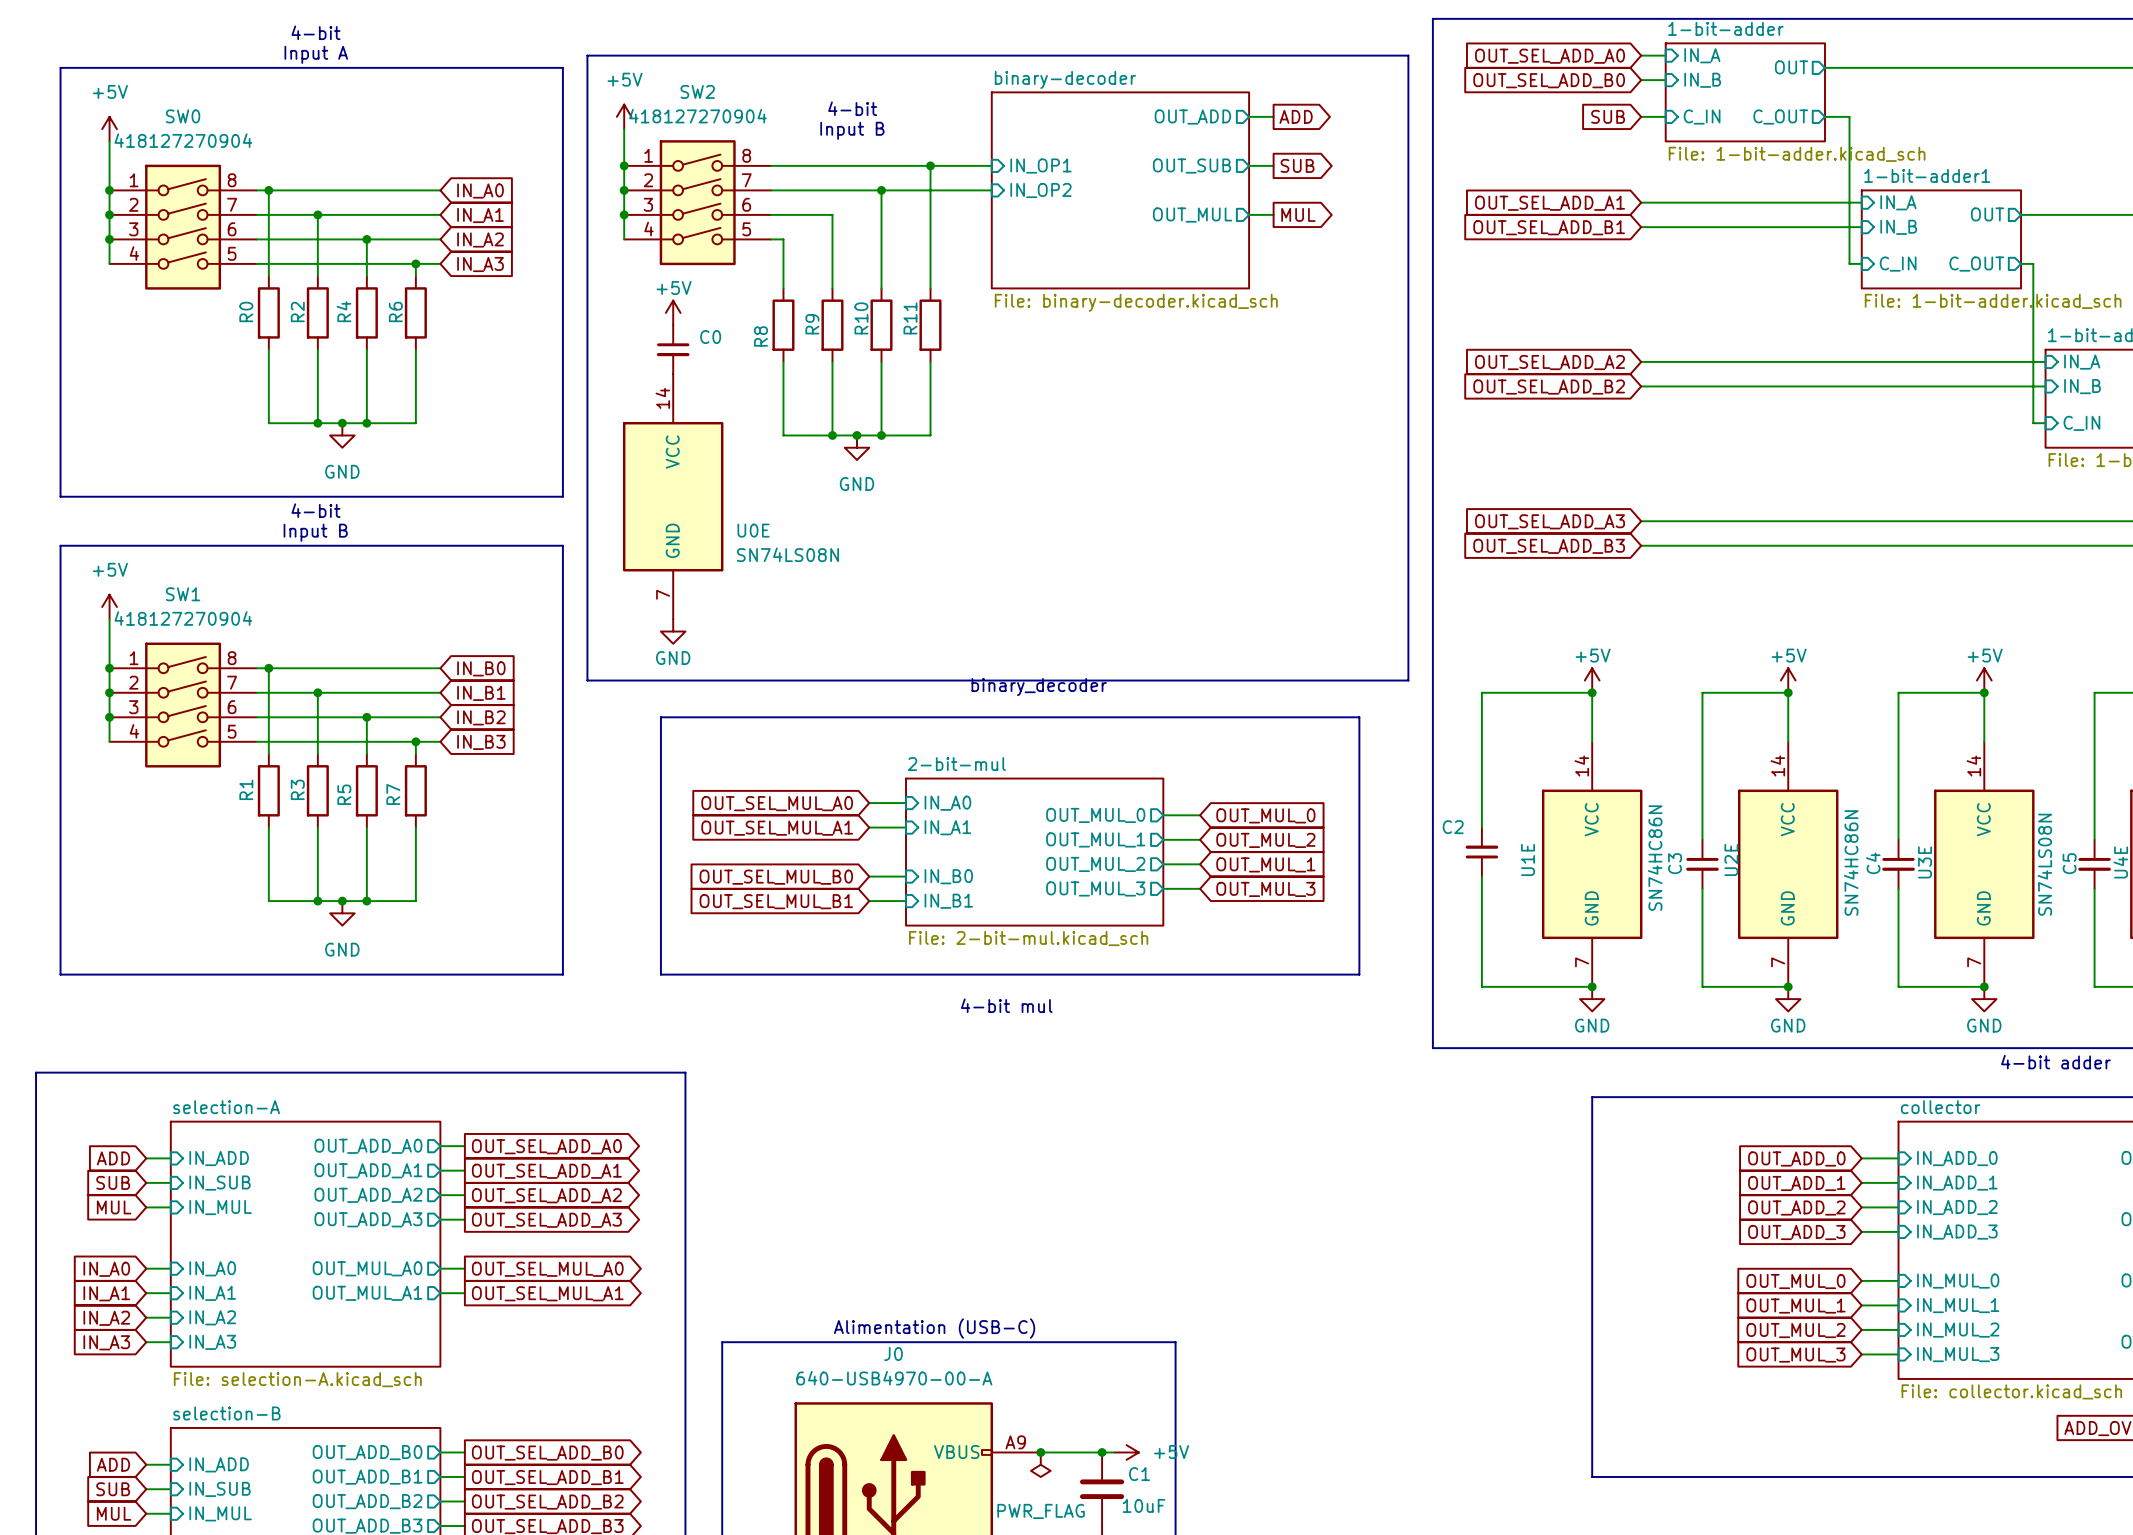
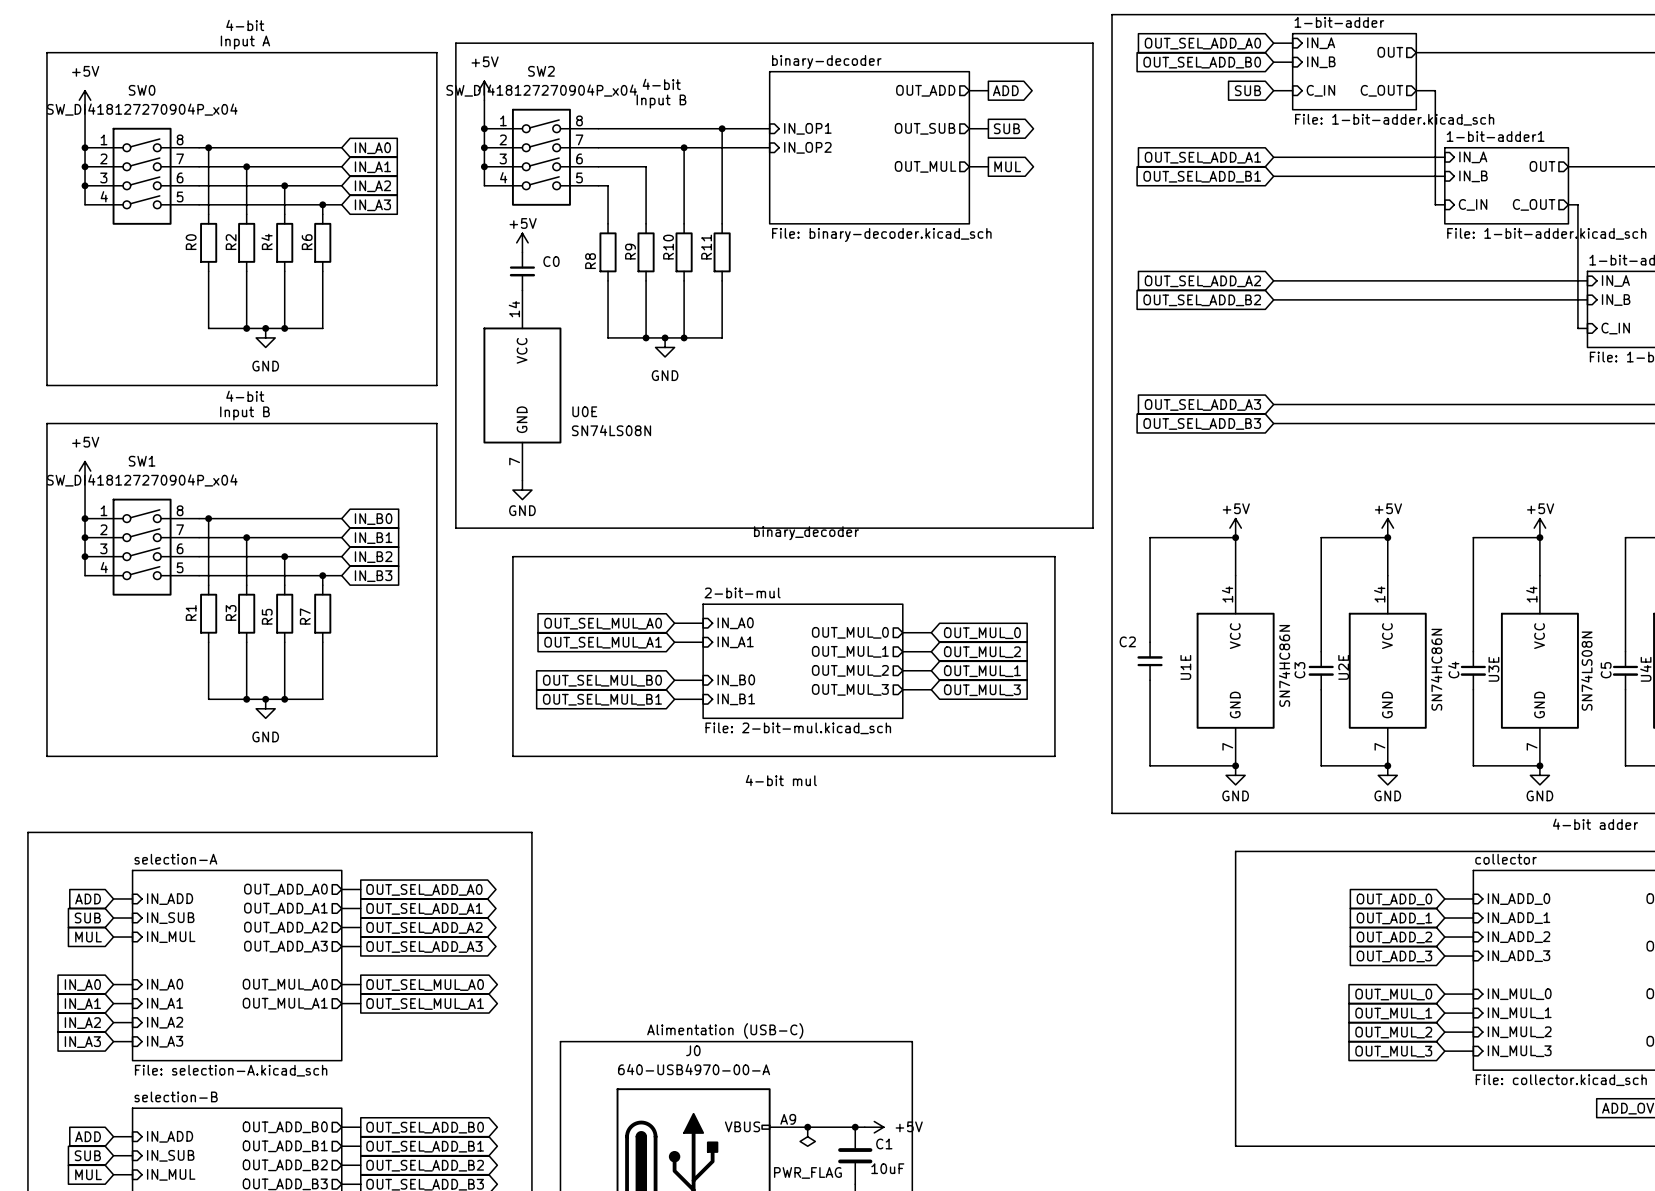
SW2 value: 418127270904 (698, 116) -> SW_DI418127270904P_x04 (541, 90)
SW0 value: 418127270904 (183, 140) -> SW_DI418127270904P_x04 (142, 109)
SW1 value: 418127270904 (183, 618) -> SW_DI418127270904P_x04 (142, 480)

